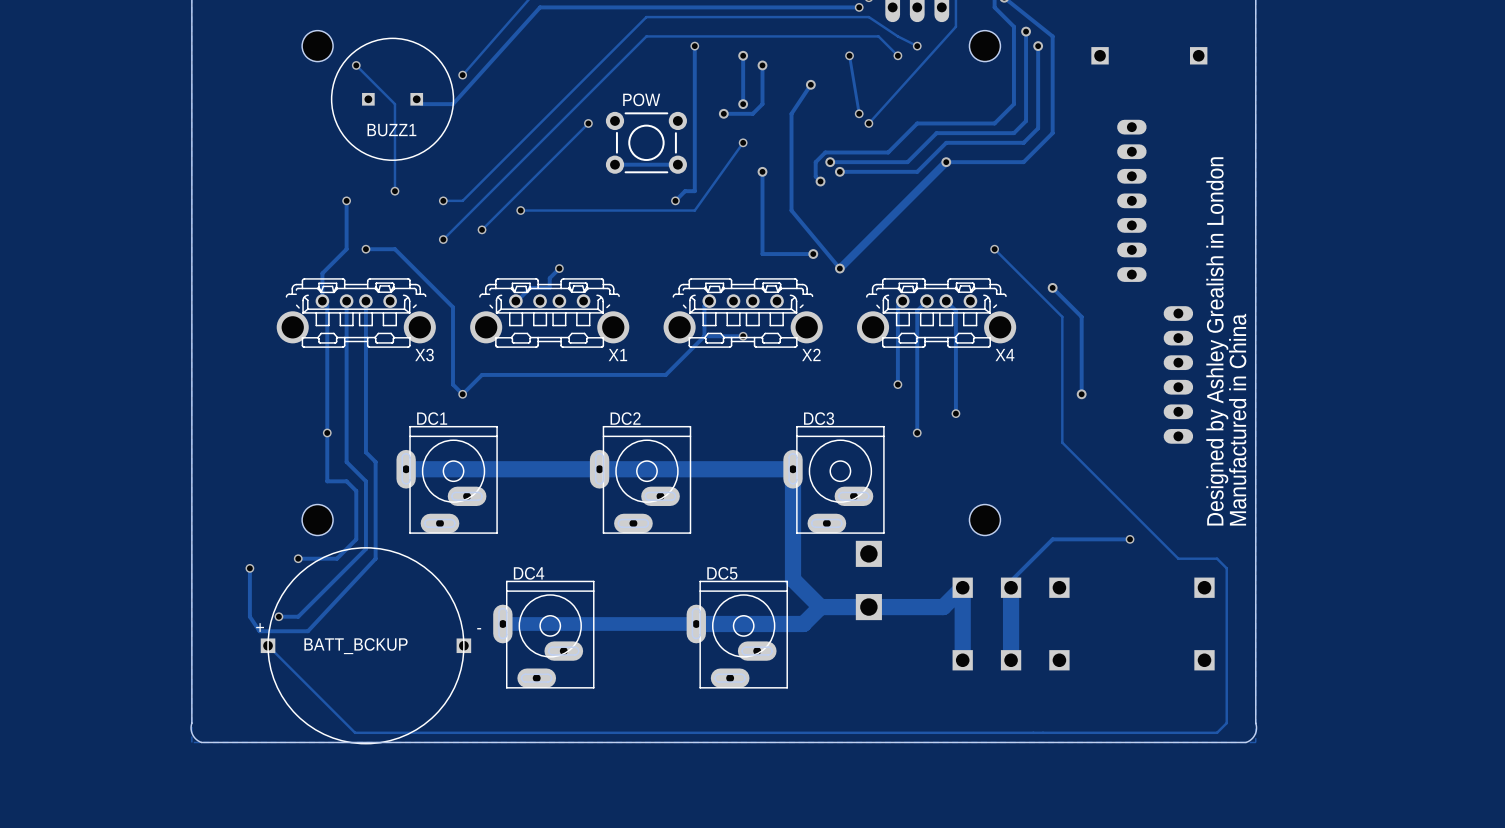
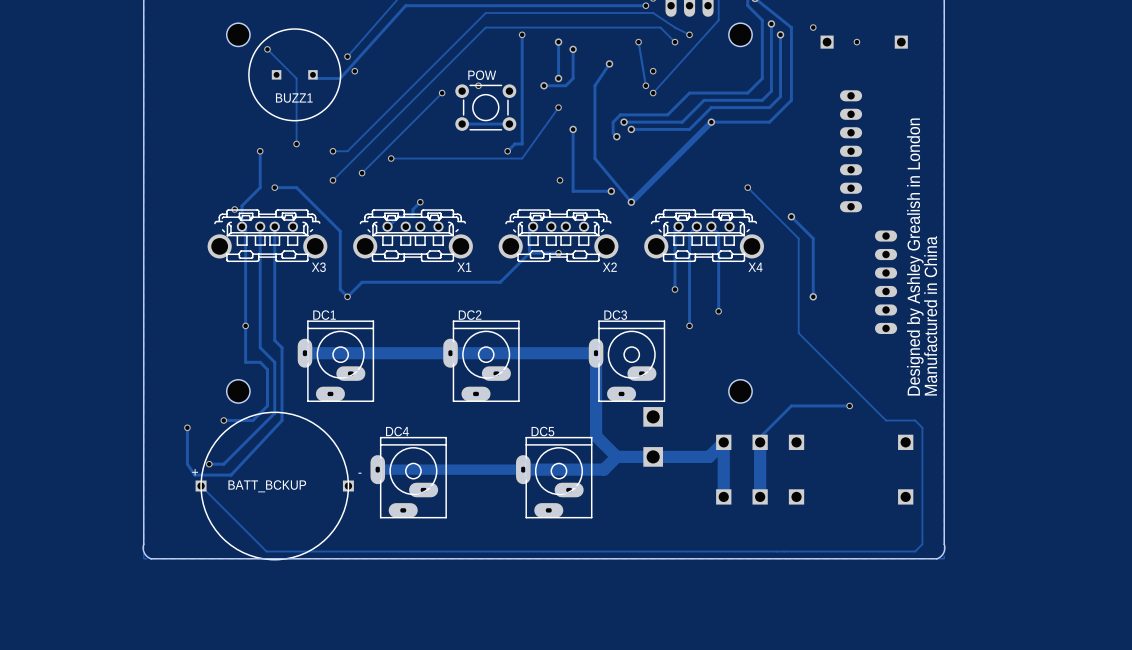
via: none -> (813, 27)
via: none -> (856, 42)
via: none -> (354, 71)
via: none -> (653, 71)
via: none -> (478, 85)
via: none -> (560, 180)
via: none -> (234, 209)

